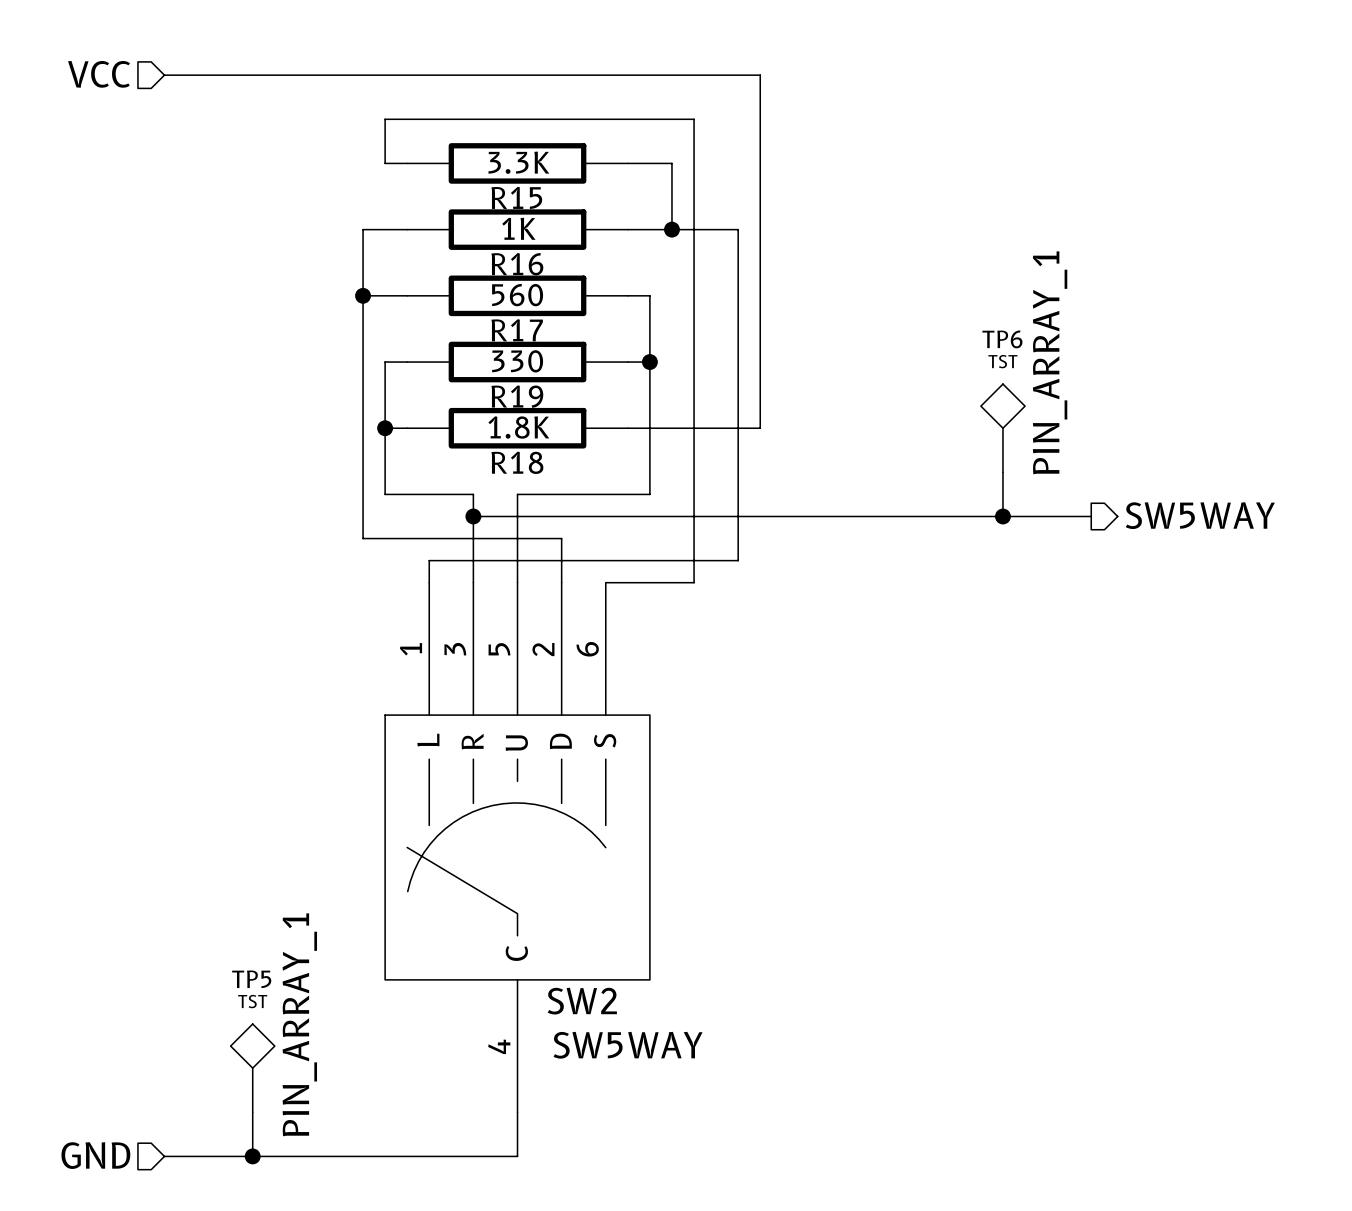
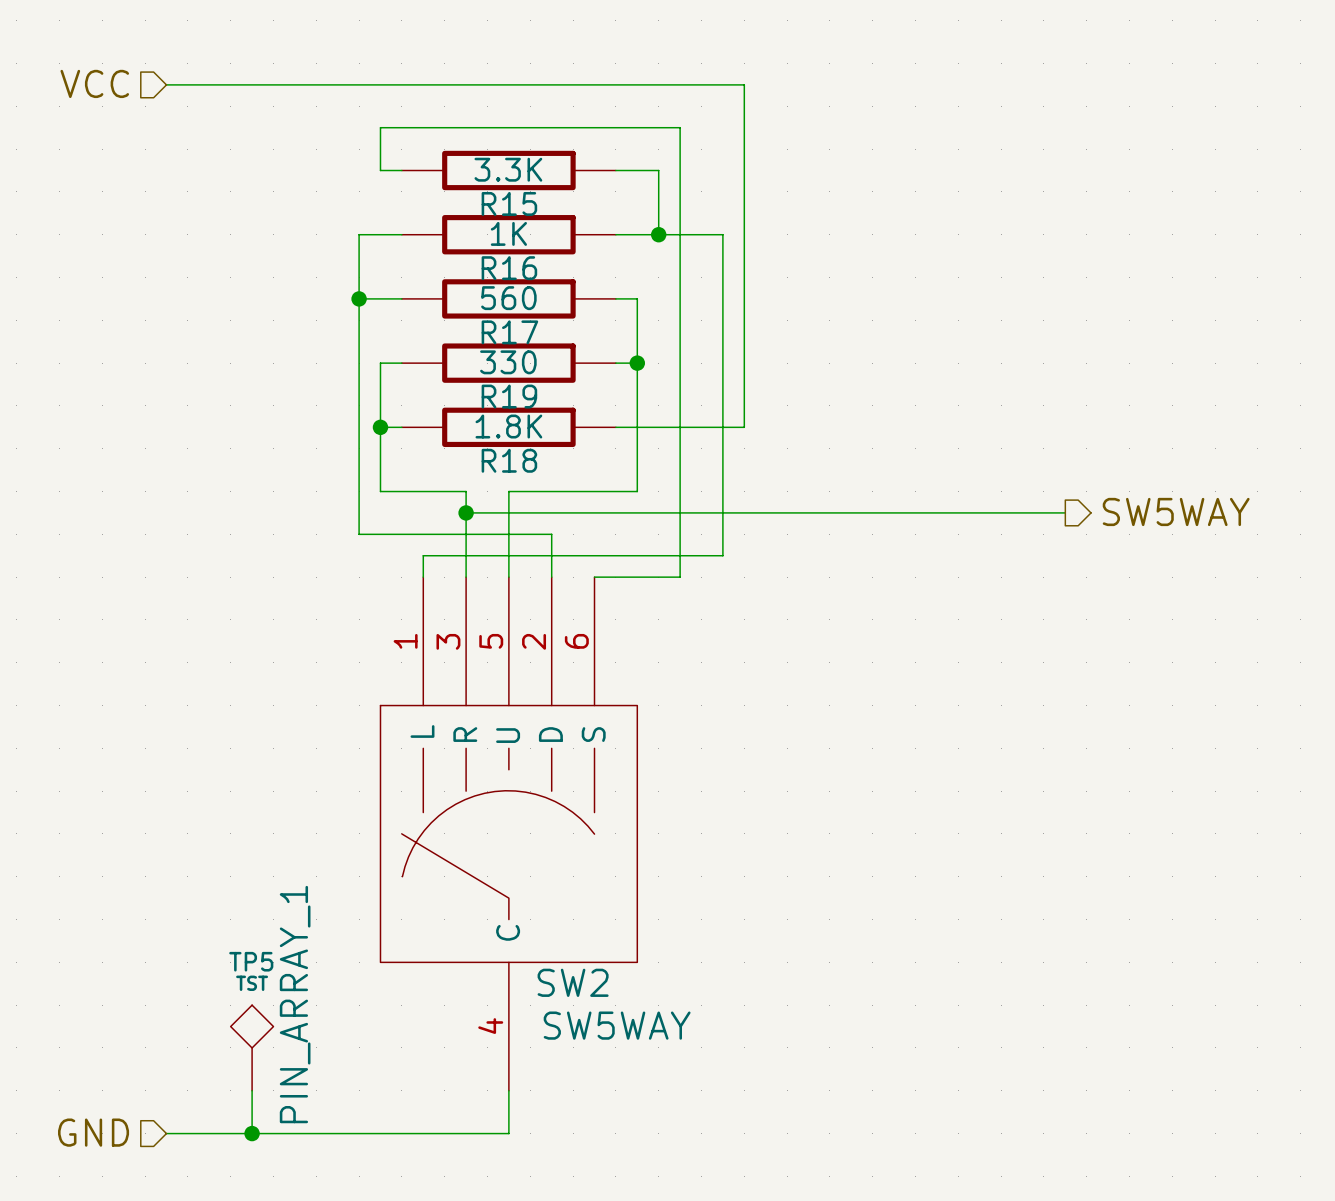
TP6: TST (1002, 428) -> none
wire: (1002, 472) (1002, 516) -> none
junction: (1002, 516) -> none

